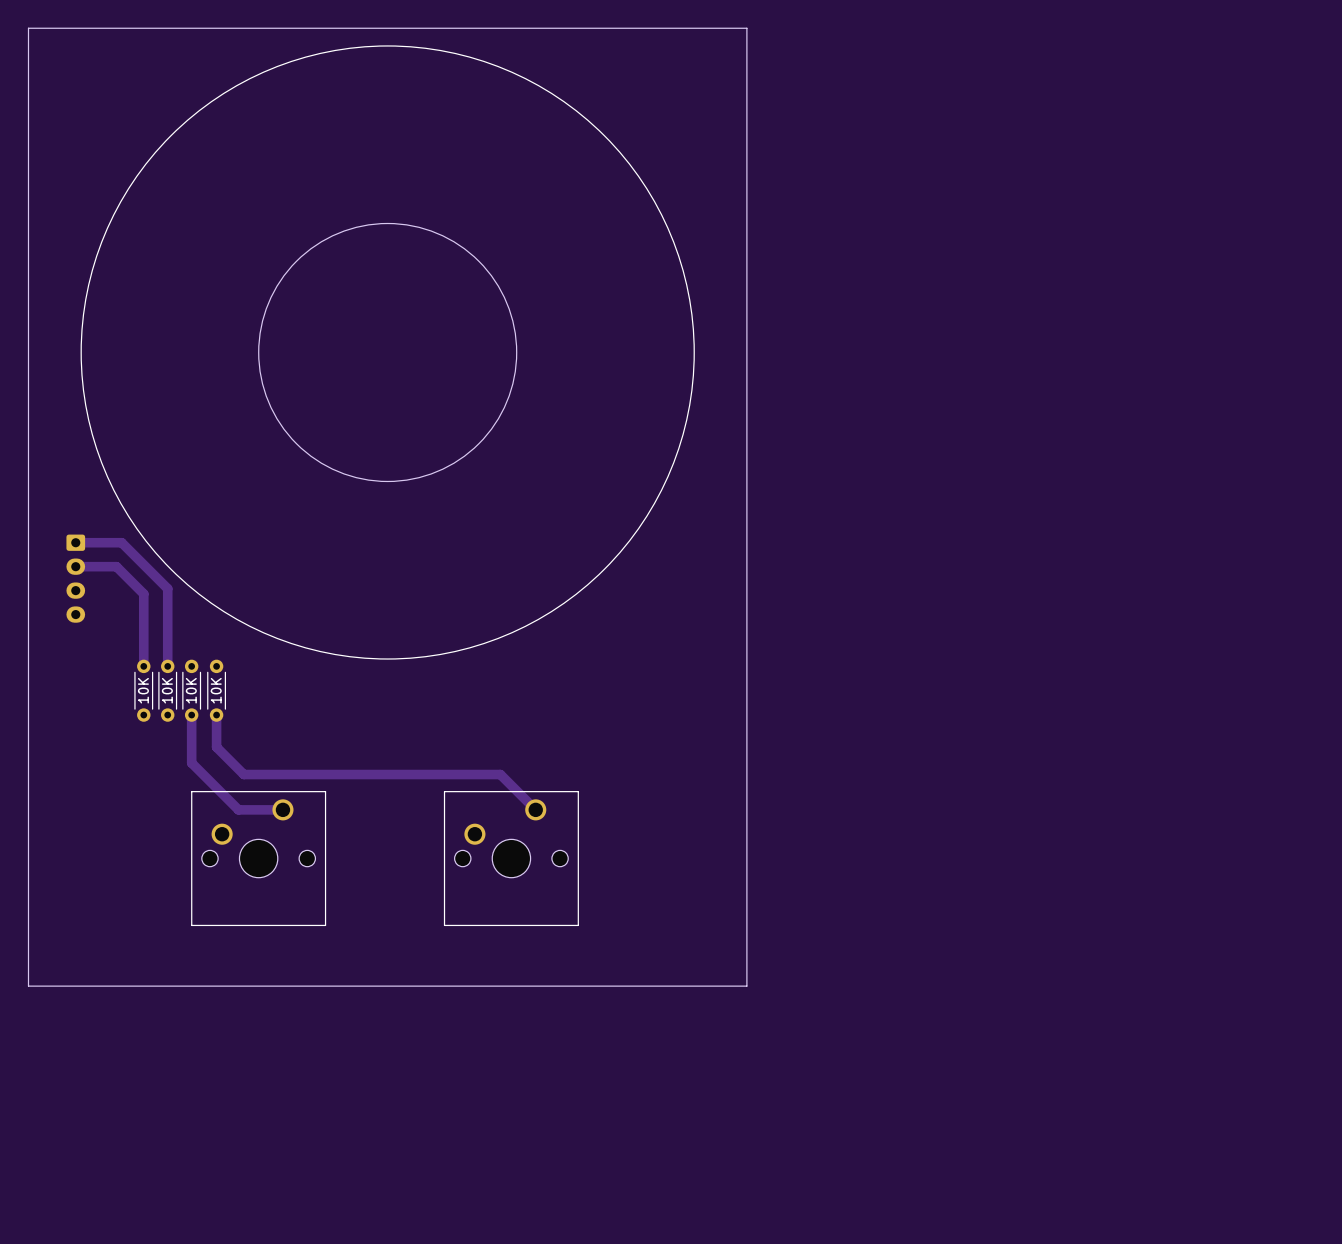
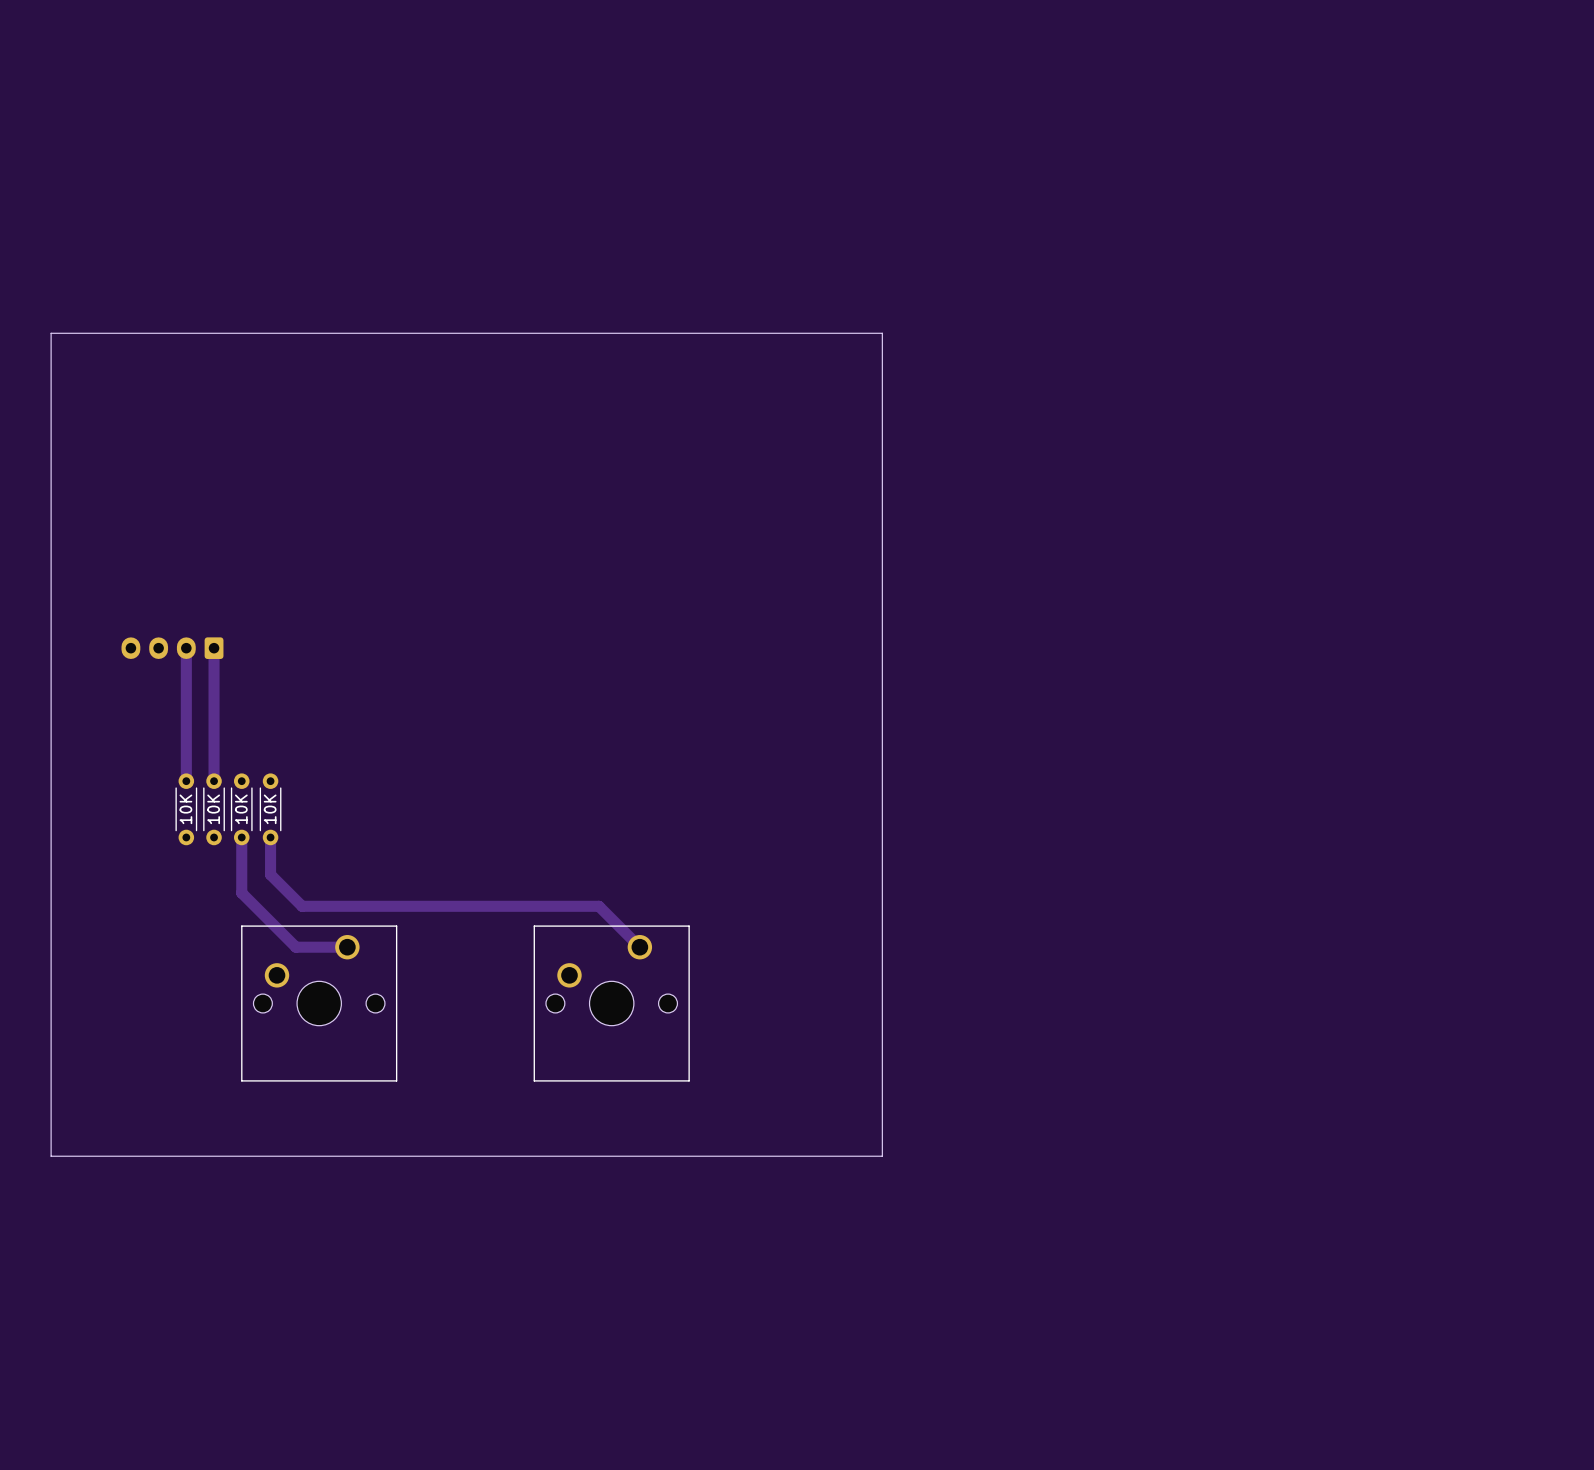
board edge: (28, 28) (746, 28) (746, 986) (28, 986) (28, 28) -> (51, 333) (51, 1156) (882, 1156) (882, 333) (51, 333)
drawing: [80, 45, 695, 660] -> none
round board edge: [258, 223, 517, 482] -> none
track: (75, 542) (121, 542) (167, 588) -> (214, 648) (214, 691)
track: (75, 566) (116, 566) (143, 593) -> (186, 648) (186, 697)
part rotation: 0° (75, 578) -> 90° clockwise (172, 648)
part position: (75, 578) -> (172, 648)

